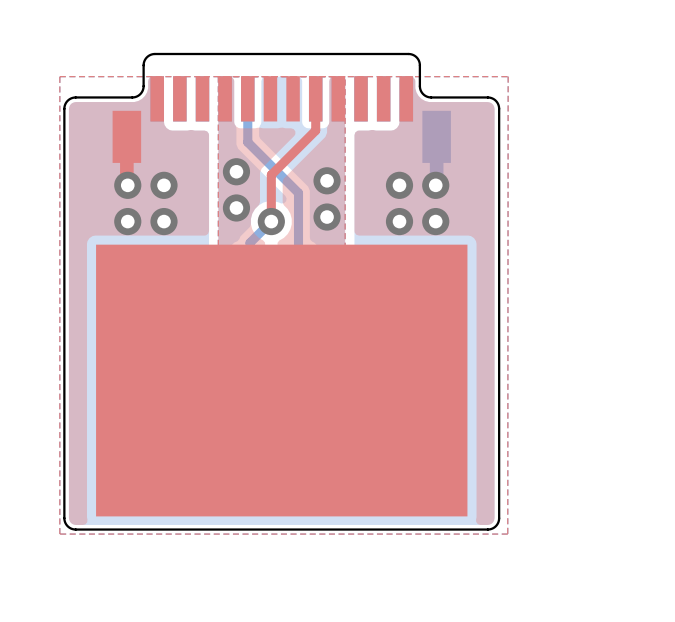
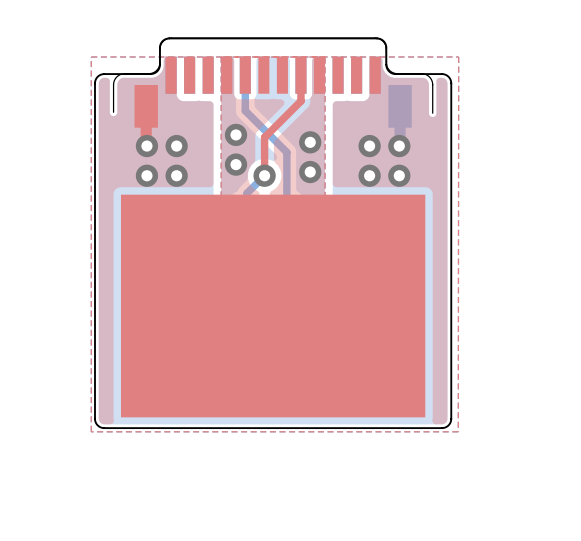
part footprint: [112, 76, 451, 163] -> [113, 37, 433, 128]

